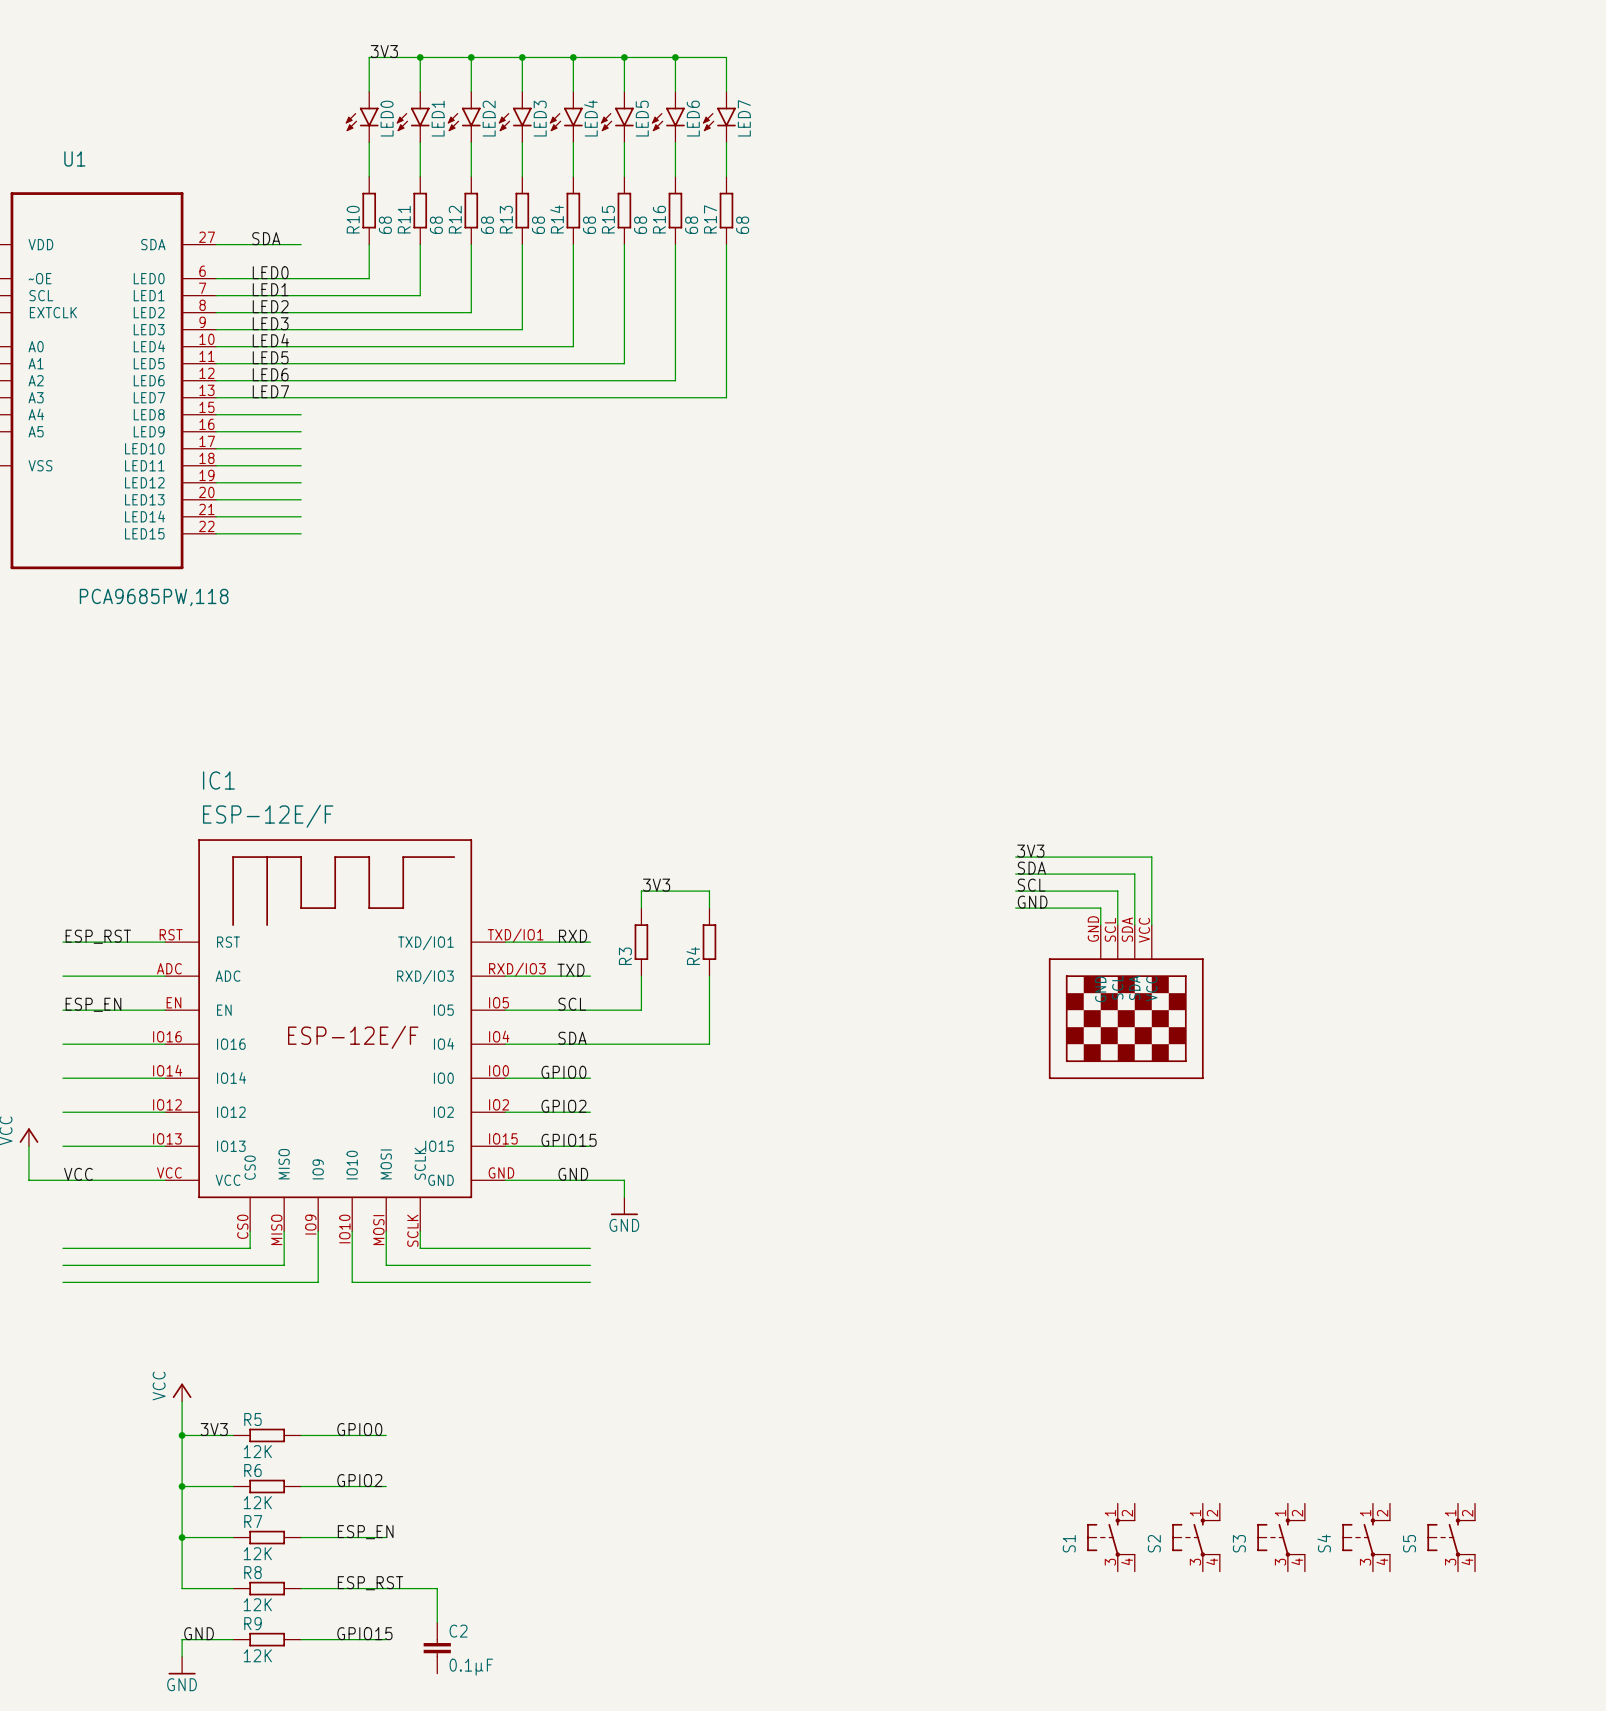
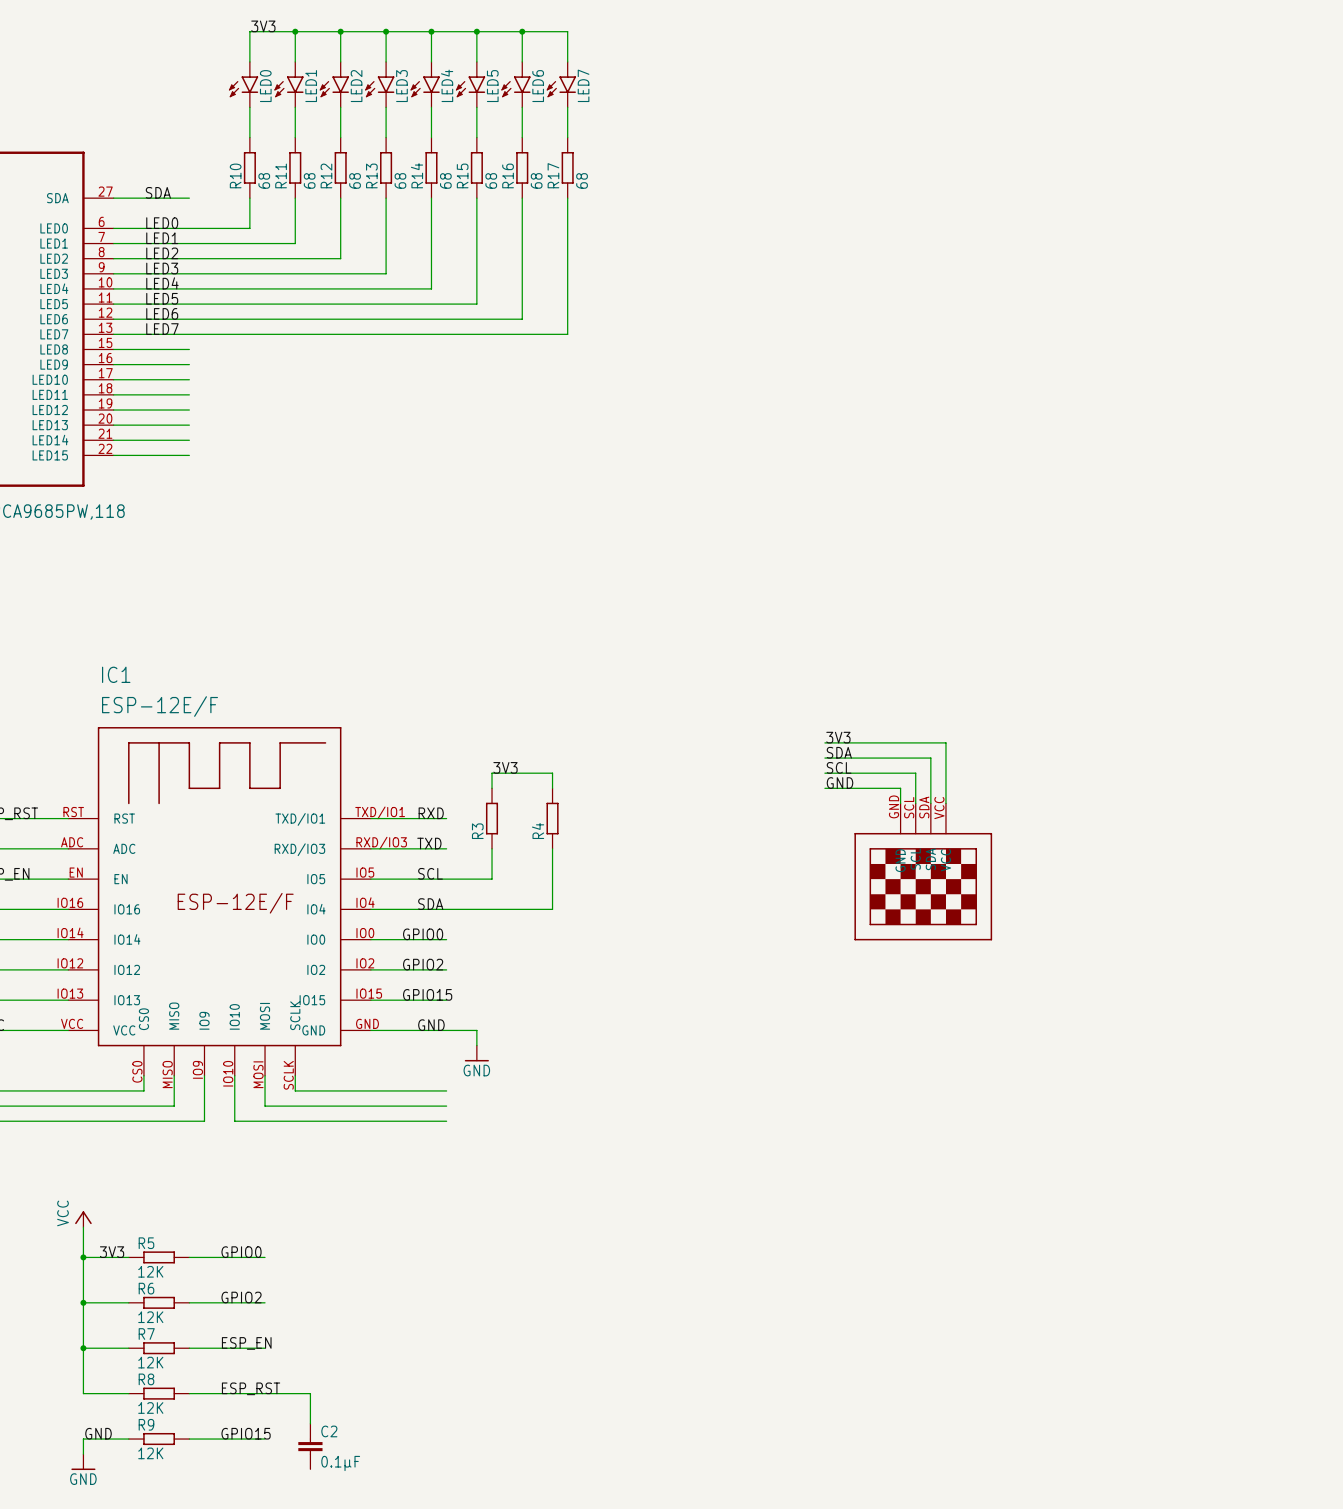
S1: (1111, 1537) -> none
S2: (1196, 1537) -> none
S3: (1281, 1537) -> none
S4: (1366, 1537) -> none
S5: (1451, 1537) -> none

